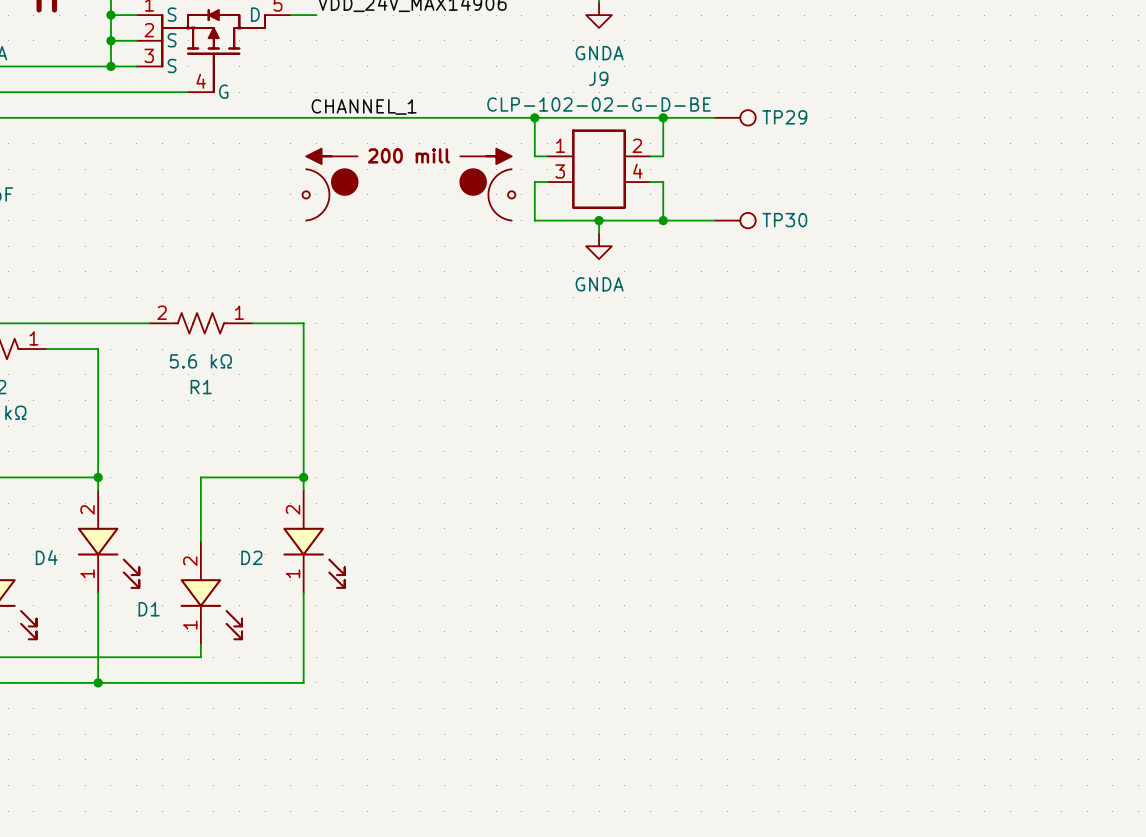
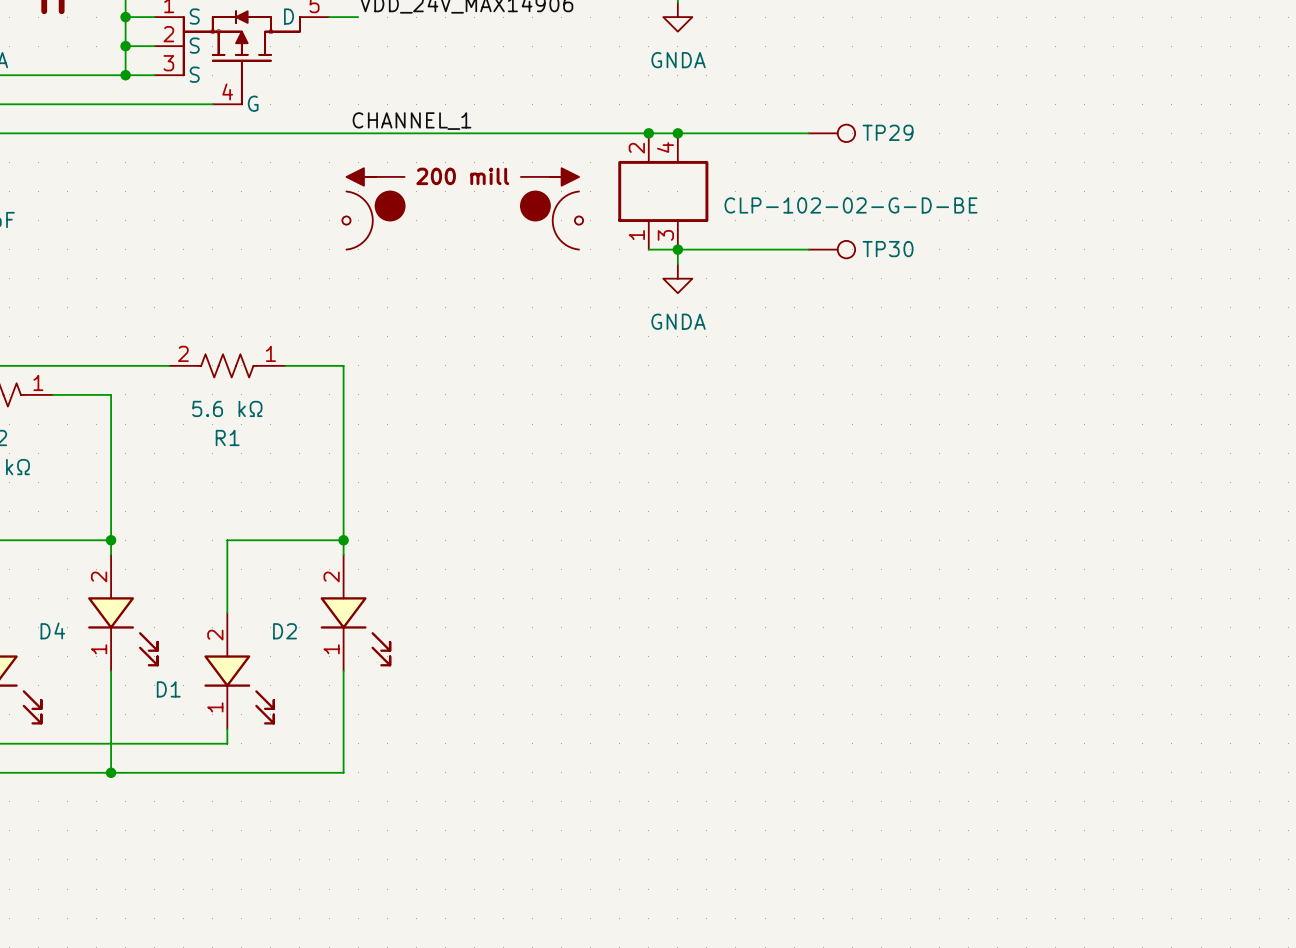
wire: (534, 117) (534, 156) (547, 156) -> none
junction: (534, 117) -> none
junction: none -> (648, 133)
junction: none -> (677, 133)
wire: (663, 117) (663, 156) (650, 156) -> none
junction: (663, 117) -> none
part: none -> CLP-102-02-G-D-BE (663, 191)
J9: CLP-102-02-G-D-BE (599, 169) -> none
wire: (547, 182) (534, 182) (534, 220) (573, 220) -> none
wire: (650, 182) (663, 182) (663, 220) -> none
junction: (663, 220) -> none

